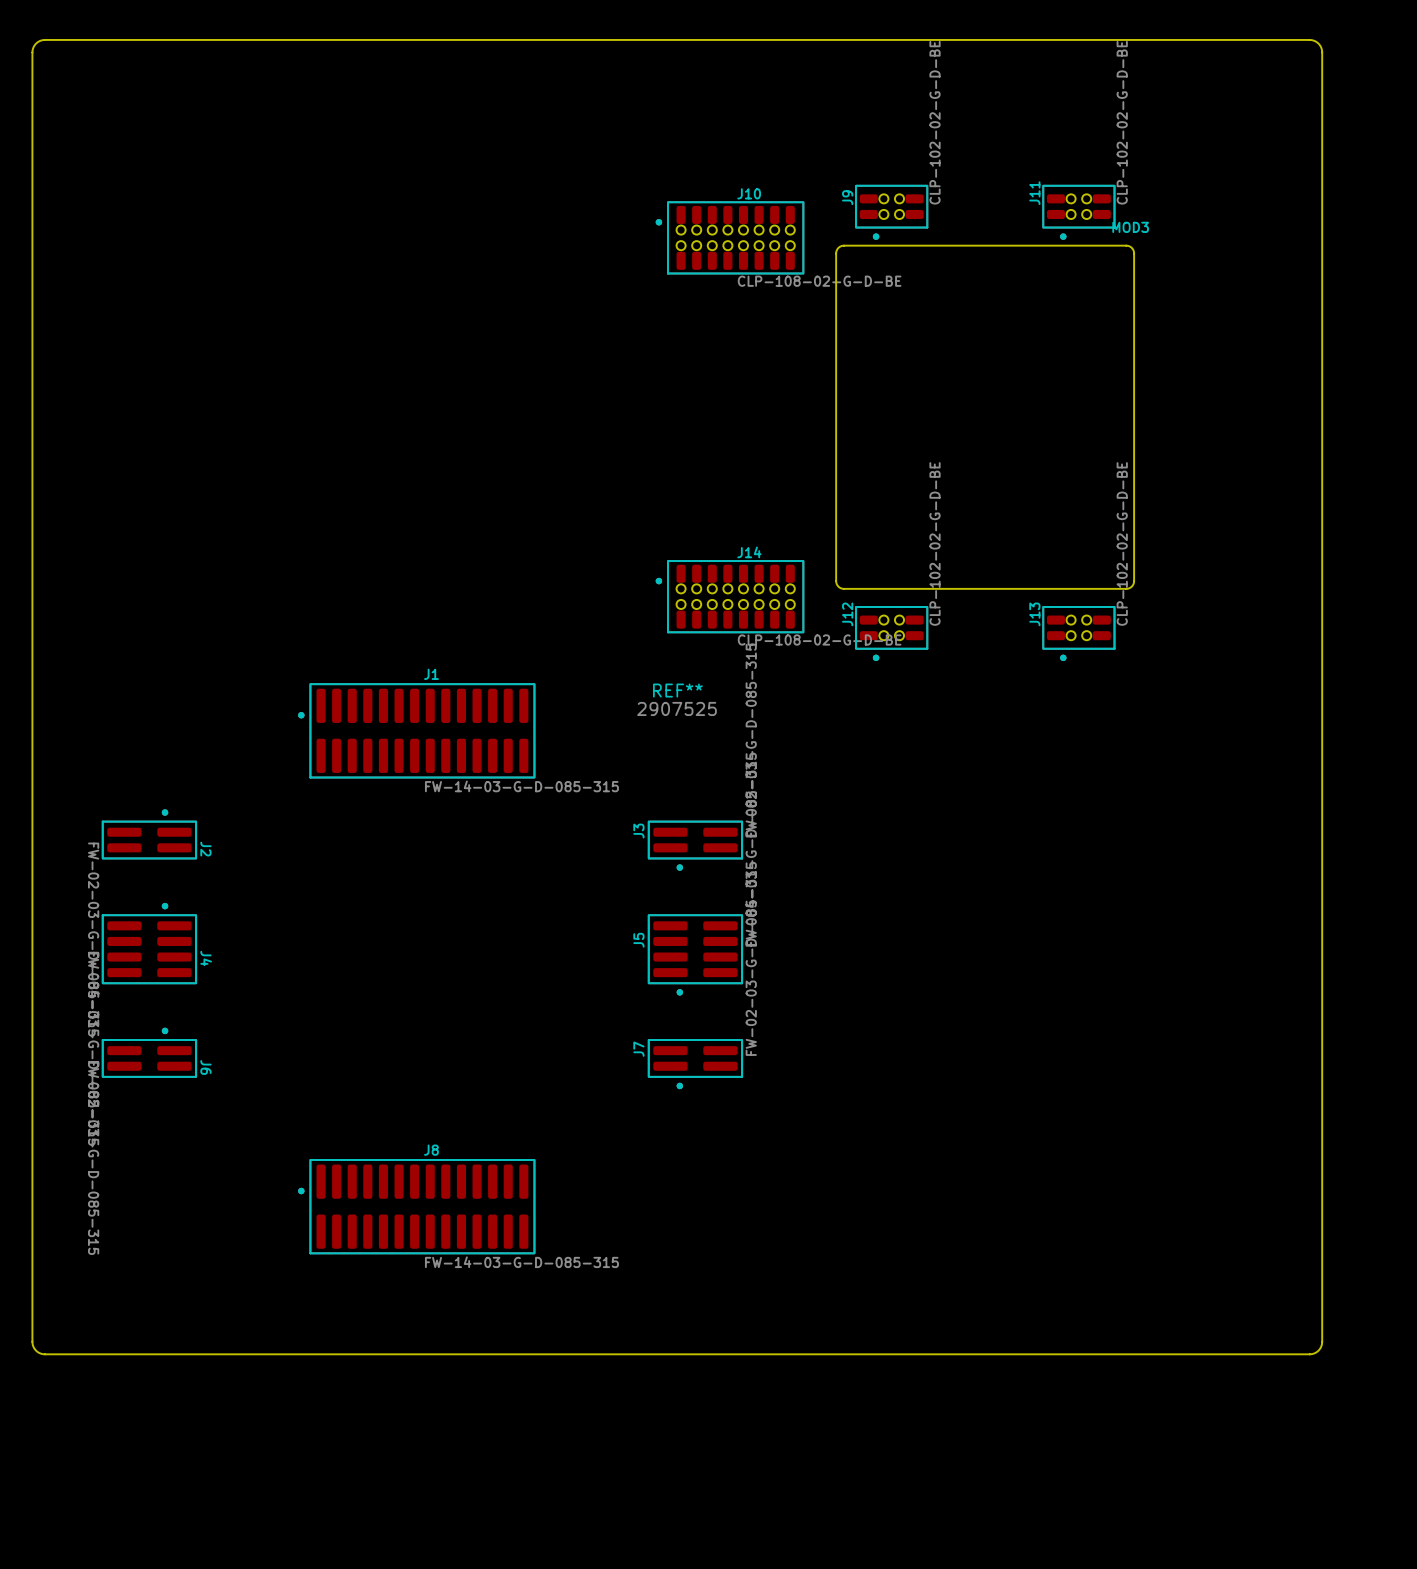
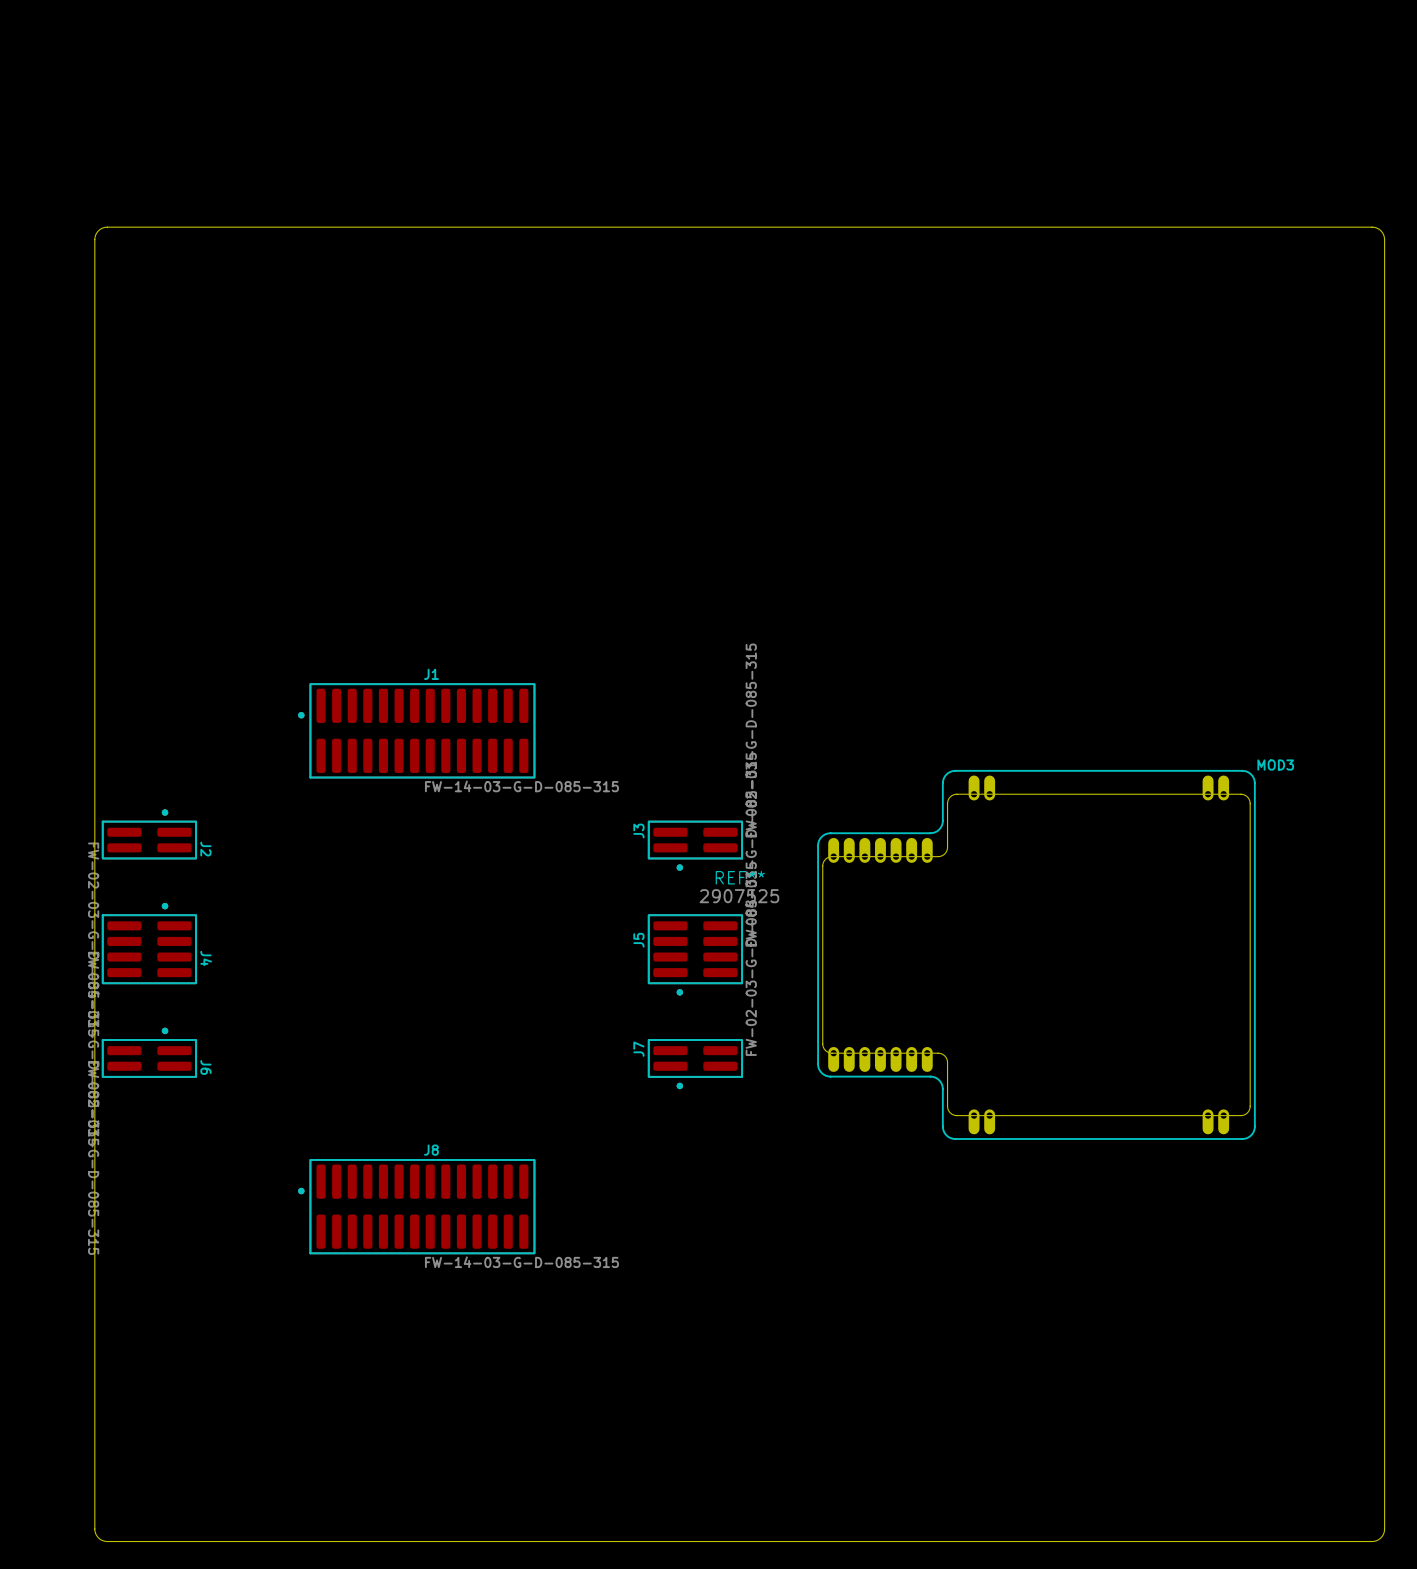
board edge: (44, 39) (1309, 39) (1318, 43) (1322, 52) (1322, 1341) (1318, 1350) (1309, 1354) (44, 1354) (36, 1350) (32, 1341) (32, 52) (36, 43) (44, 39) -> (107, 227) (1372, 227) (1380, 230) (1384, 239) (1384, 1529) (1380, 1537) (1372, 1541) (107, 1541) (98, 1537) (94, 1529) (94, 239) (98, 230) (107, 227)
J9: CLP-102-02-G-D-BE (891, 212) -> none
J11: CLP-102-02-G-D-BE (1078, 212) -> none
MOD3 name position: MOD3 (1130, 227) -> MOD3 (1275, 765)
J10: CLP-108-02-G-D-BE (730, 237) -> none
MOD3 footprint: [835, 245, 1135, 590] -> [817, 769, 1256, 1140]
J14: CLP-108-02-G-D-BE (730, 596) -> none
J12: CLP-102-02-G-D-BE (891, 633) -> none
J13: CLP-102-02-G-D-BE (1078, 633) -> none
REF** position: (677, 699) -> (739, 887)

